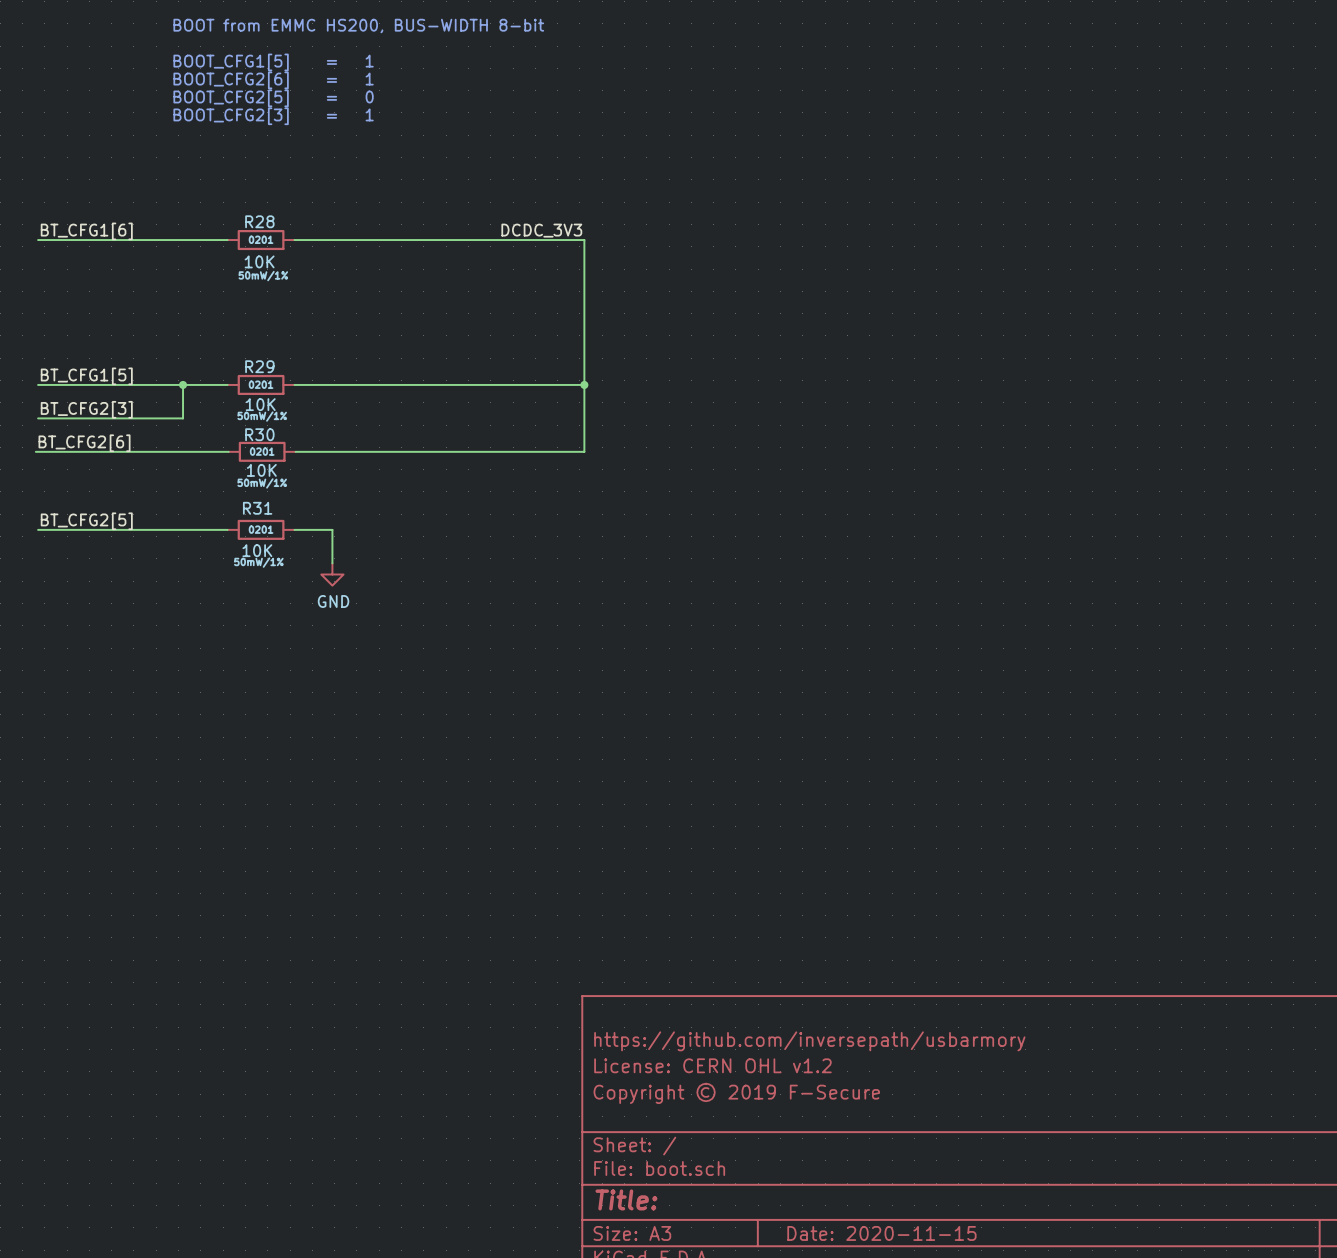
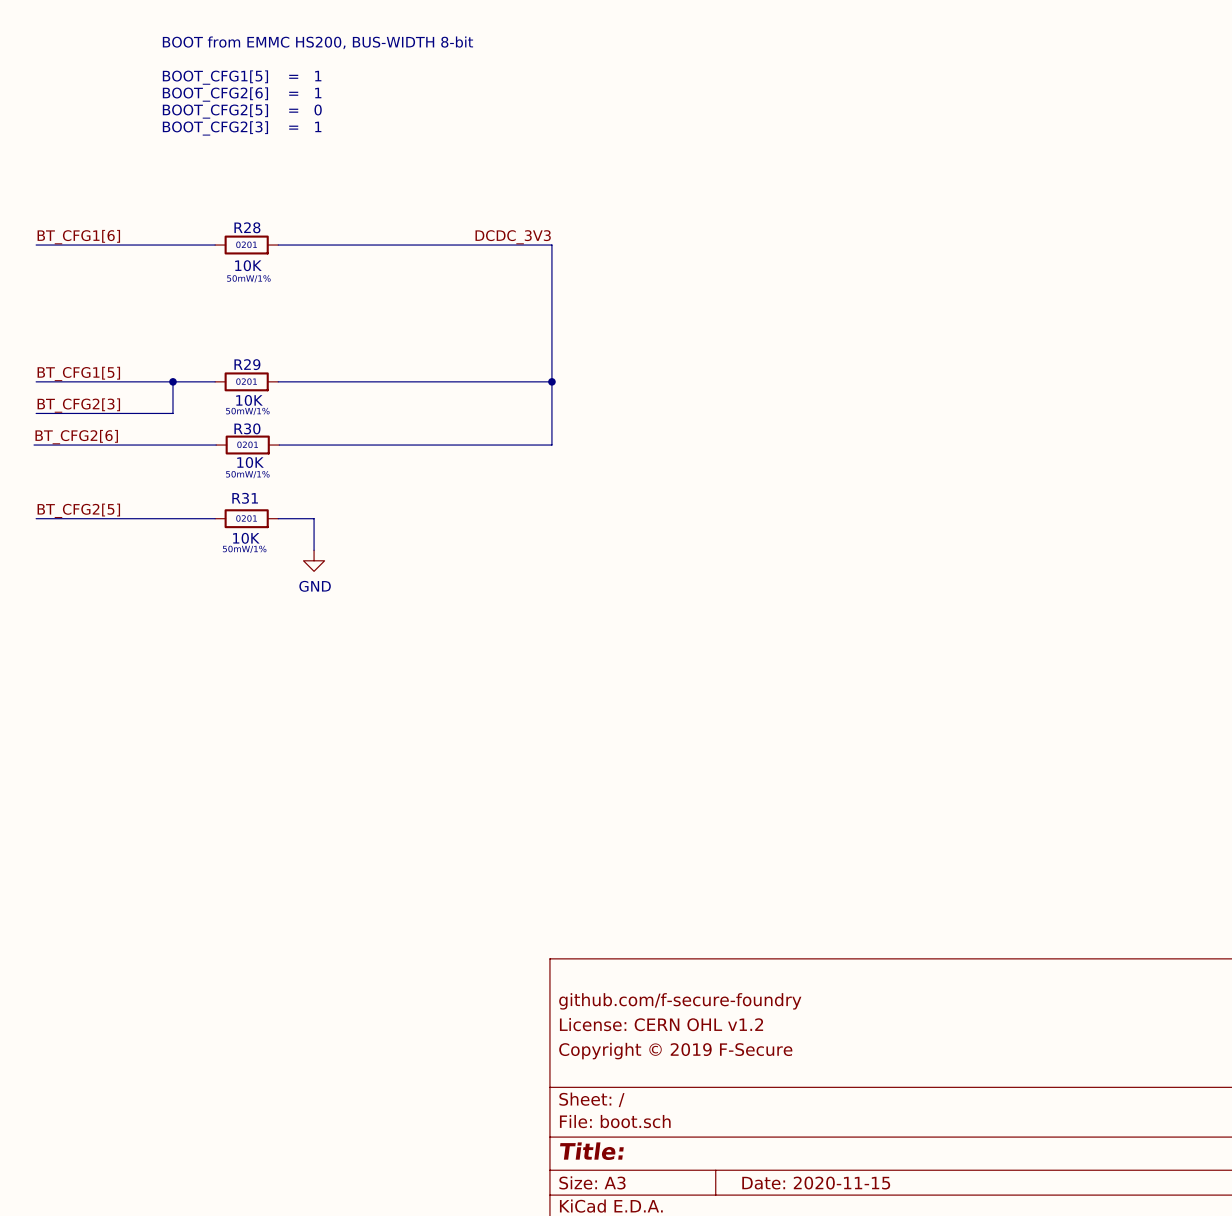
title block: https://github.com/inversepath/usbarmory (809, 1041) -> github.com/f-secure-foundry (680, 1001)

